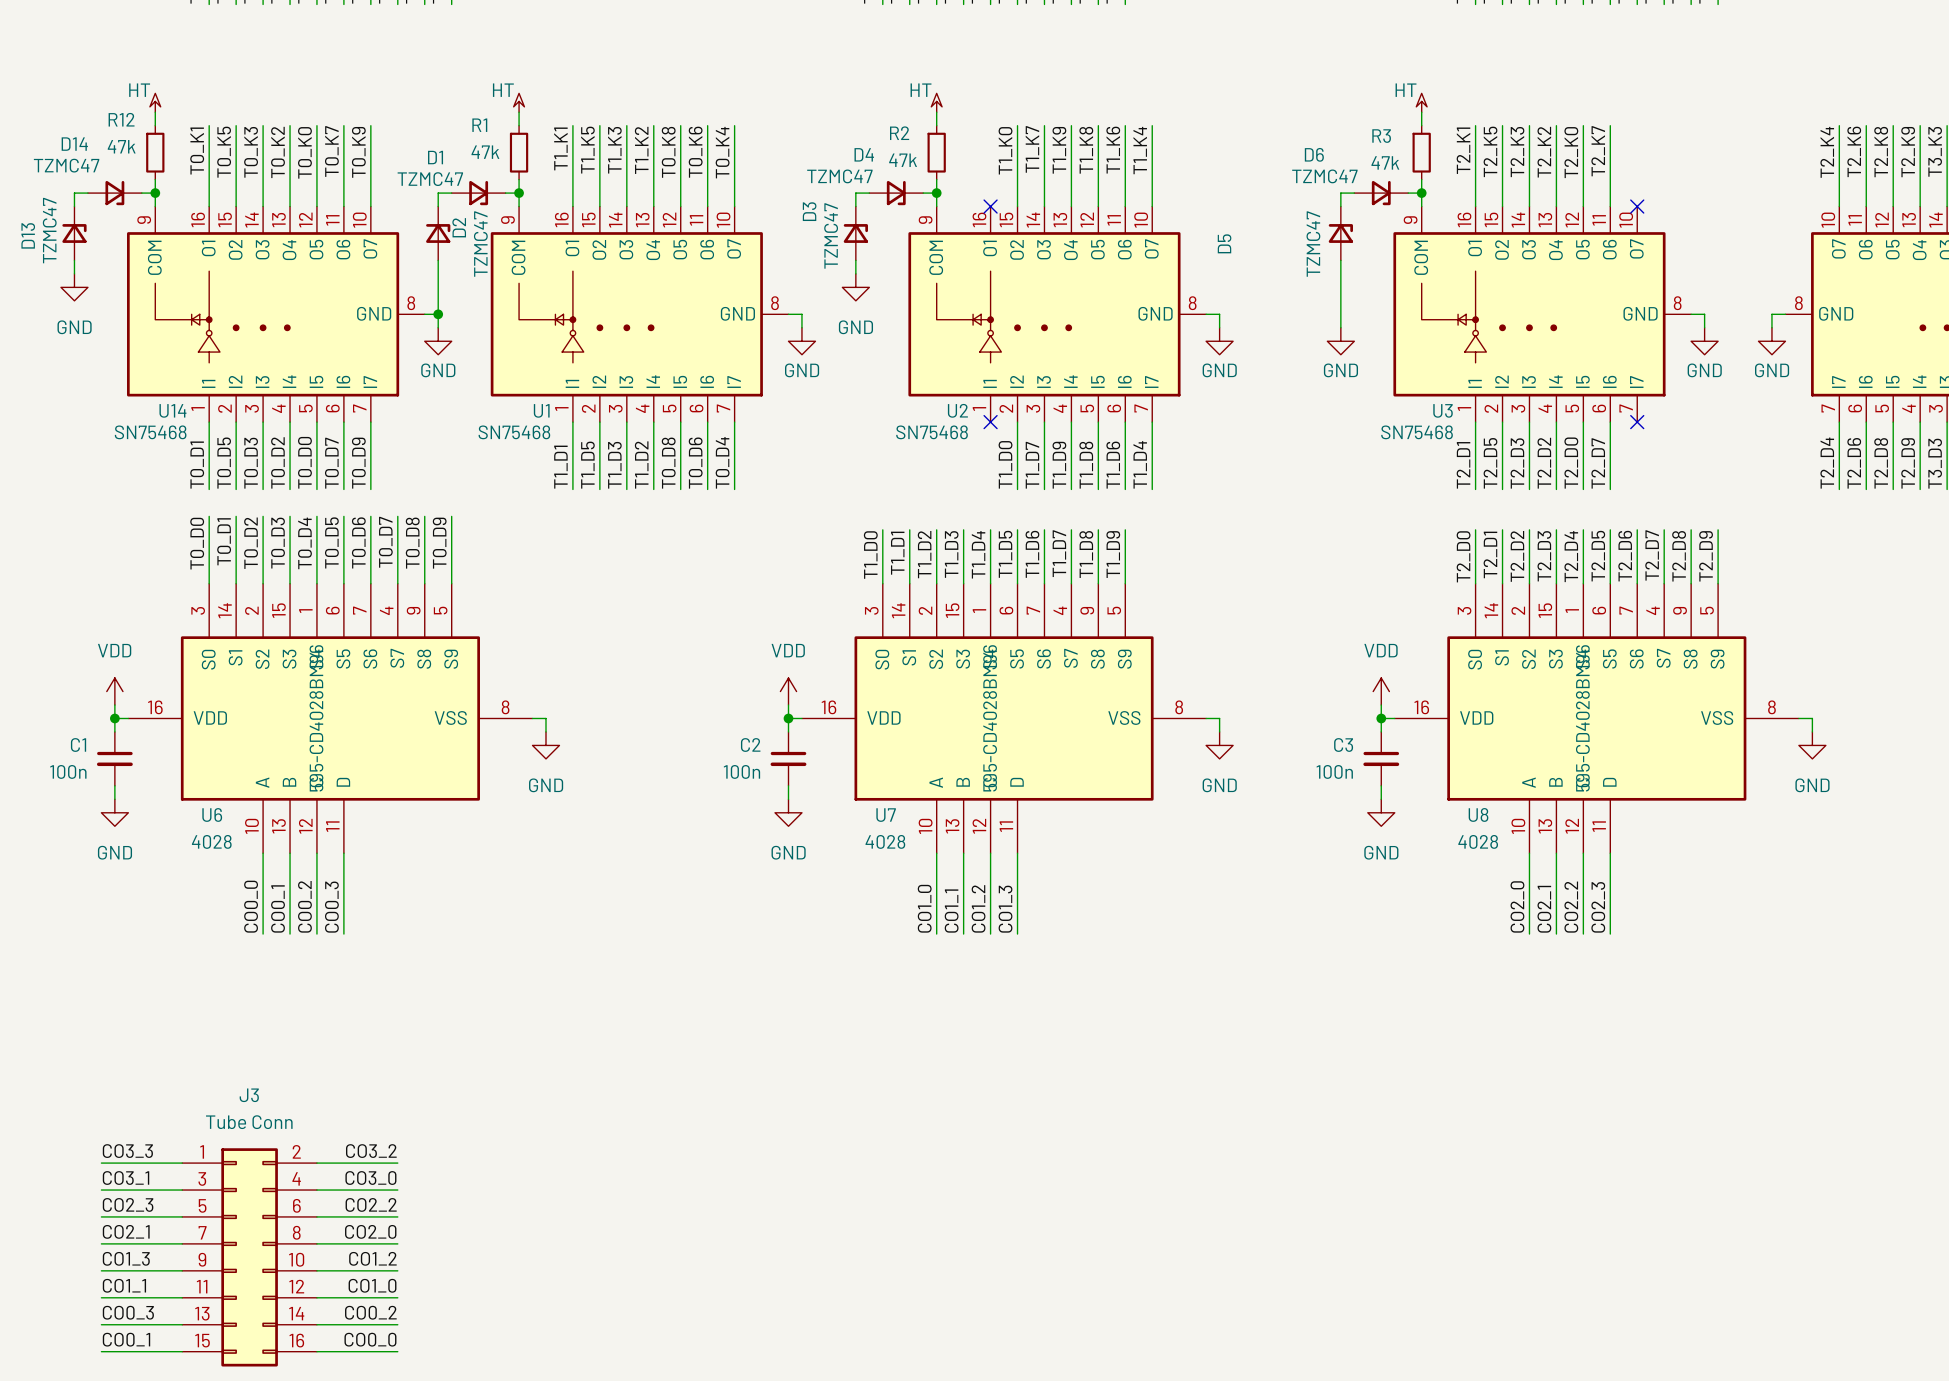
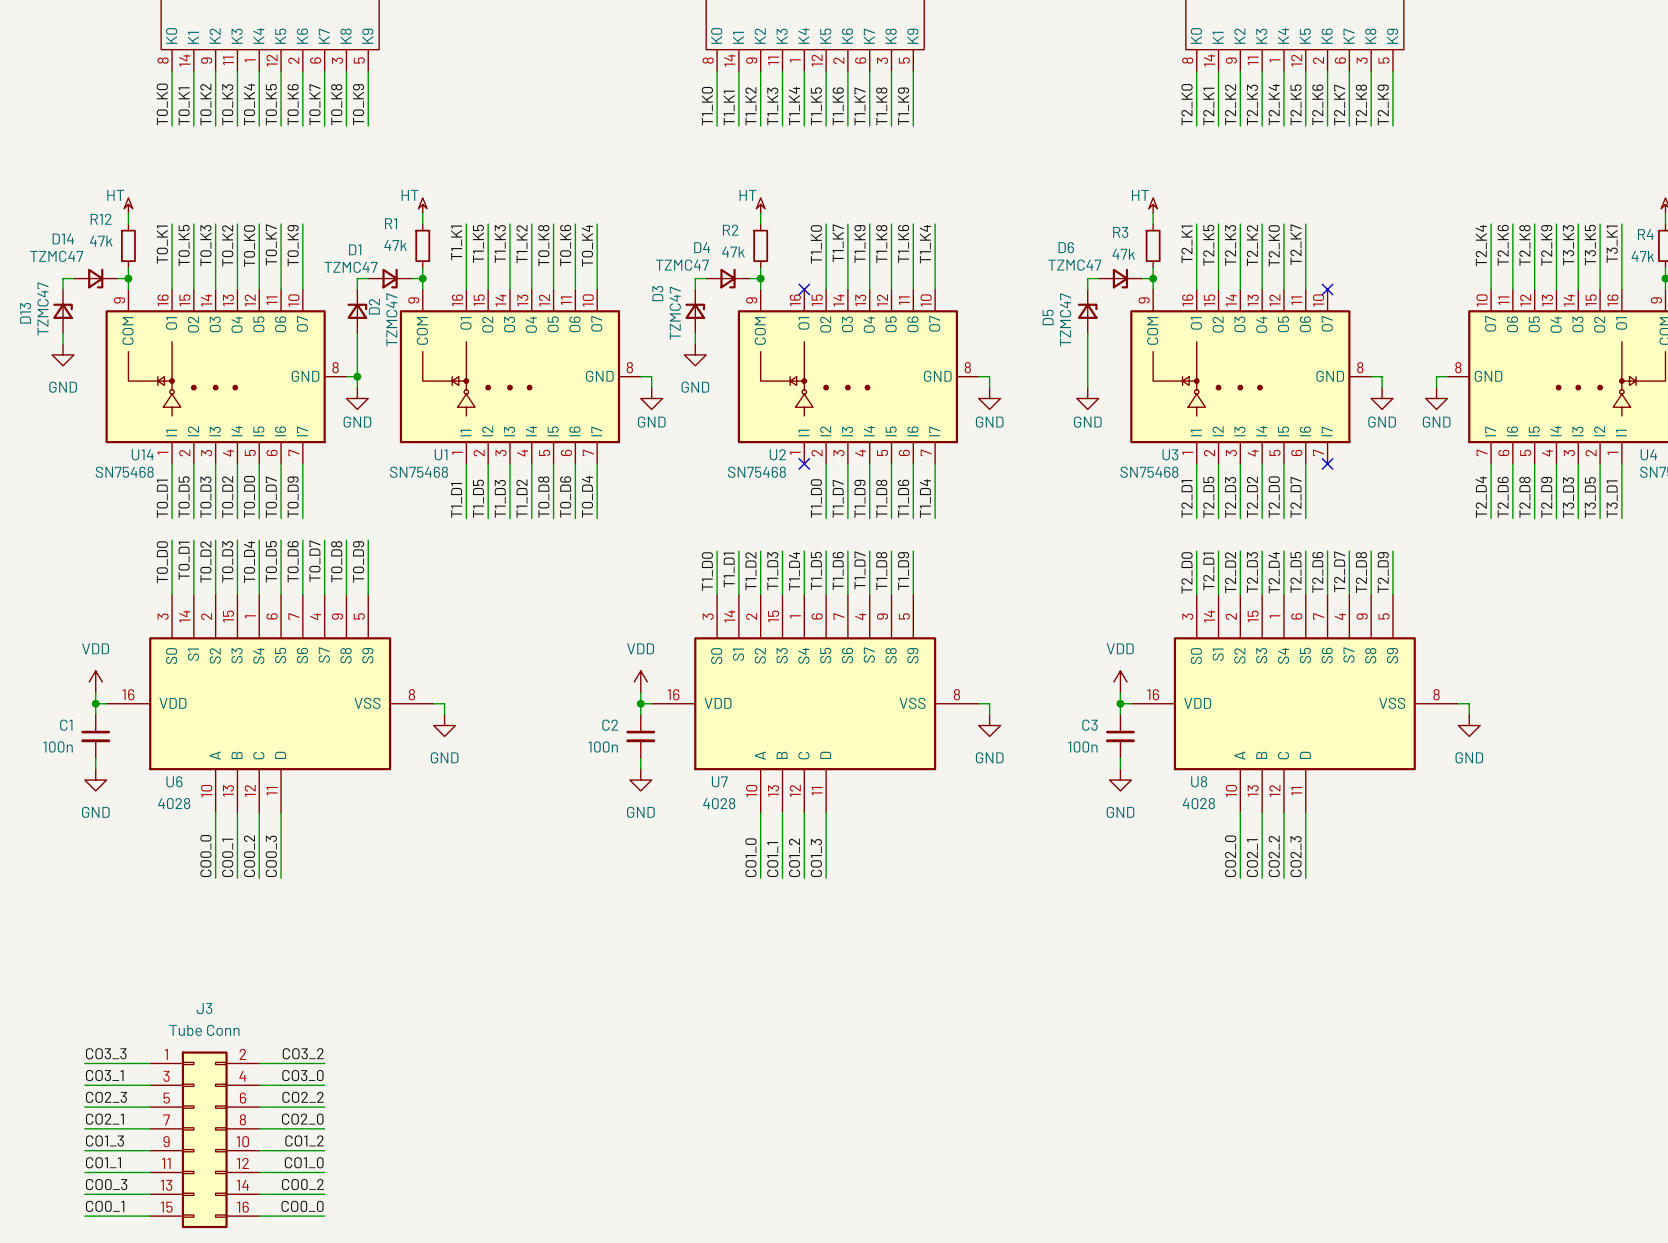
D5 name position: D5 (1224, 243) -> D5 (1048, 317)
U6 text: 595-CD4028BM96 (316, 718) -> none
U7 text: 595-CD4028BM96 (990, 718) -> none
U8 text: 595-CD4028BM96 (1582, 718) -> none

